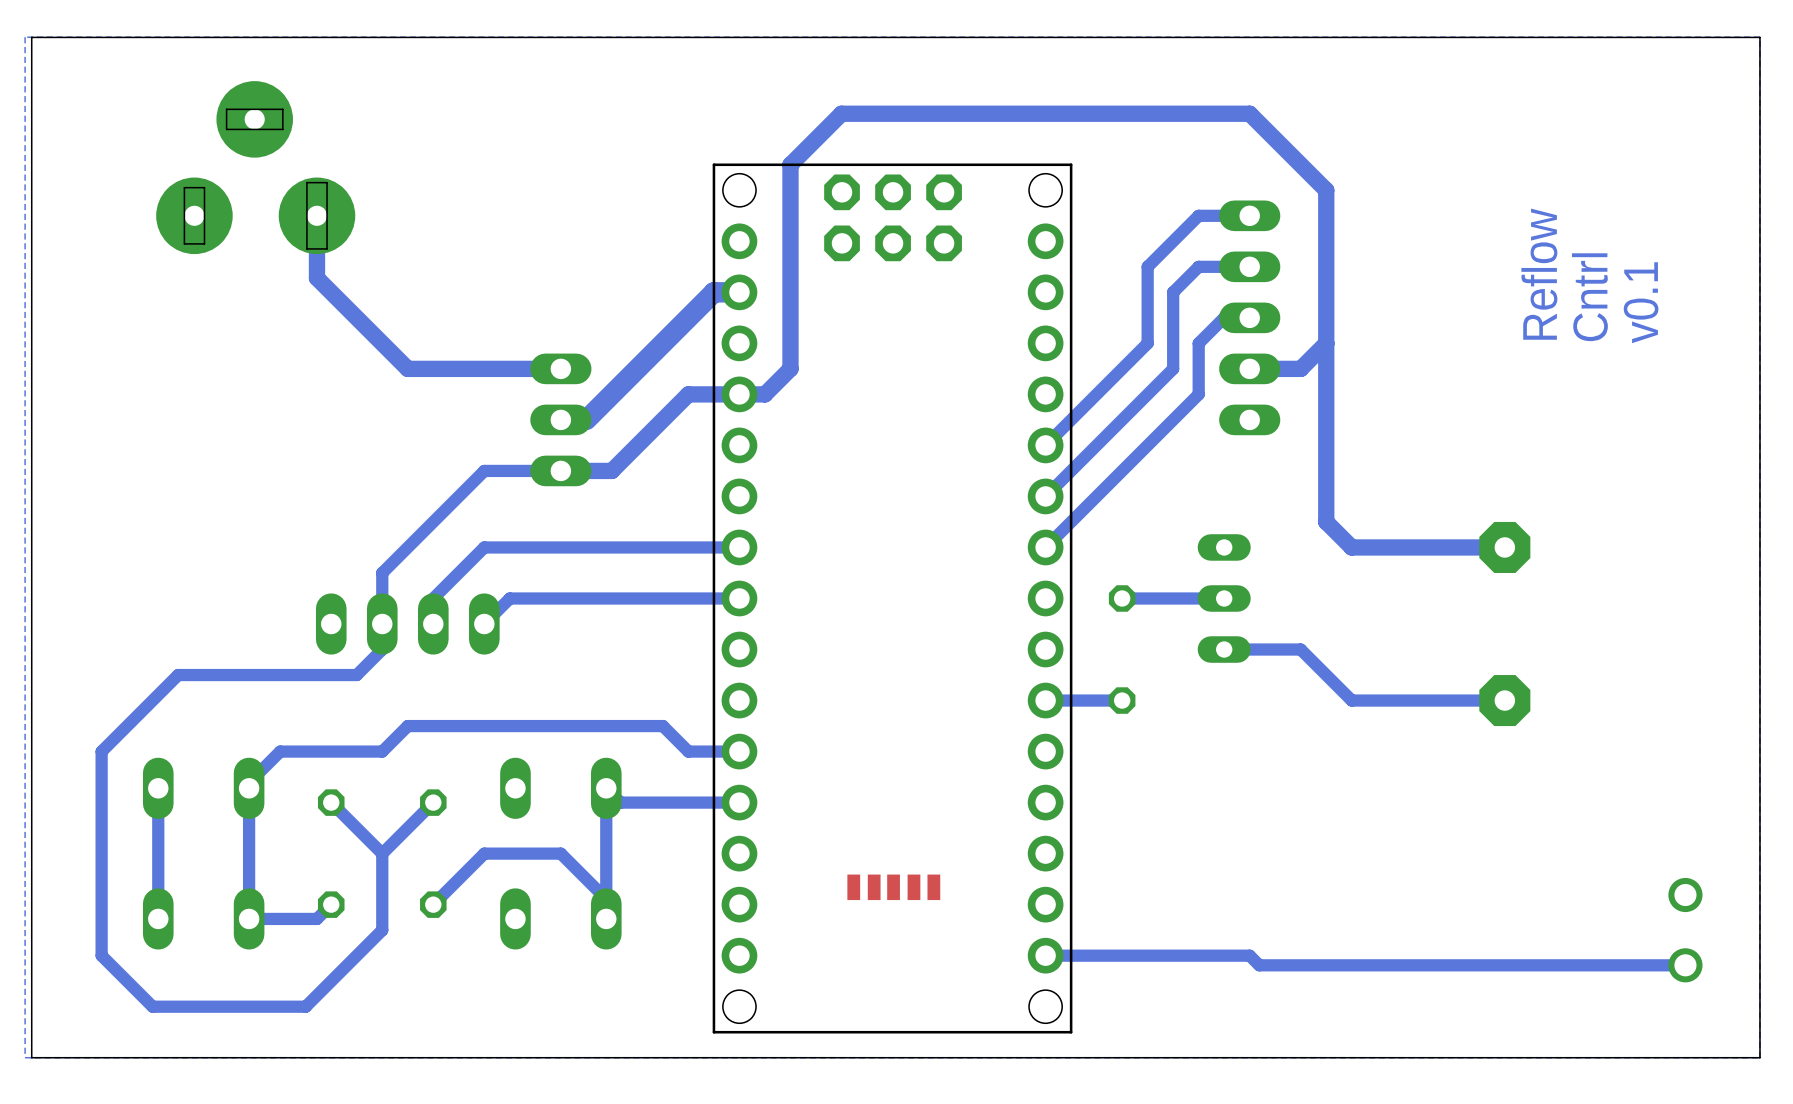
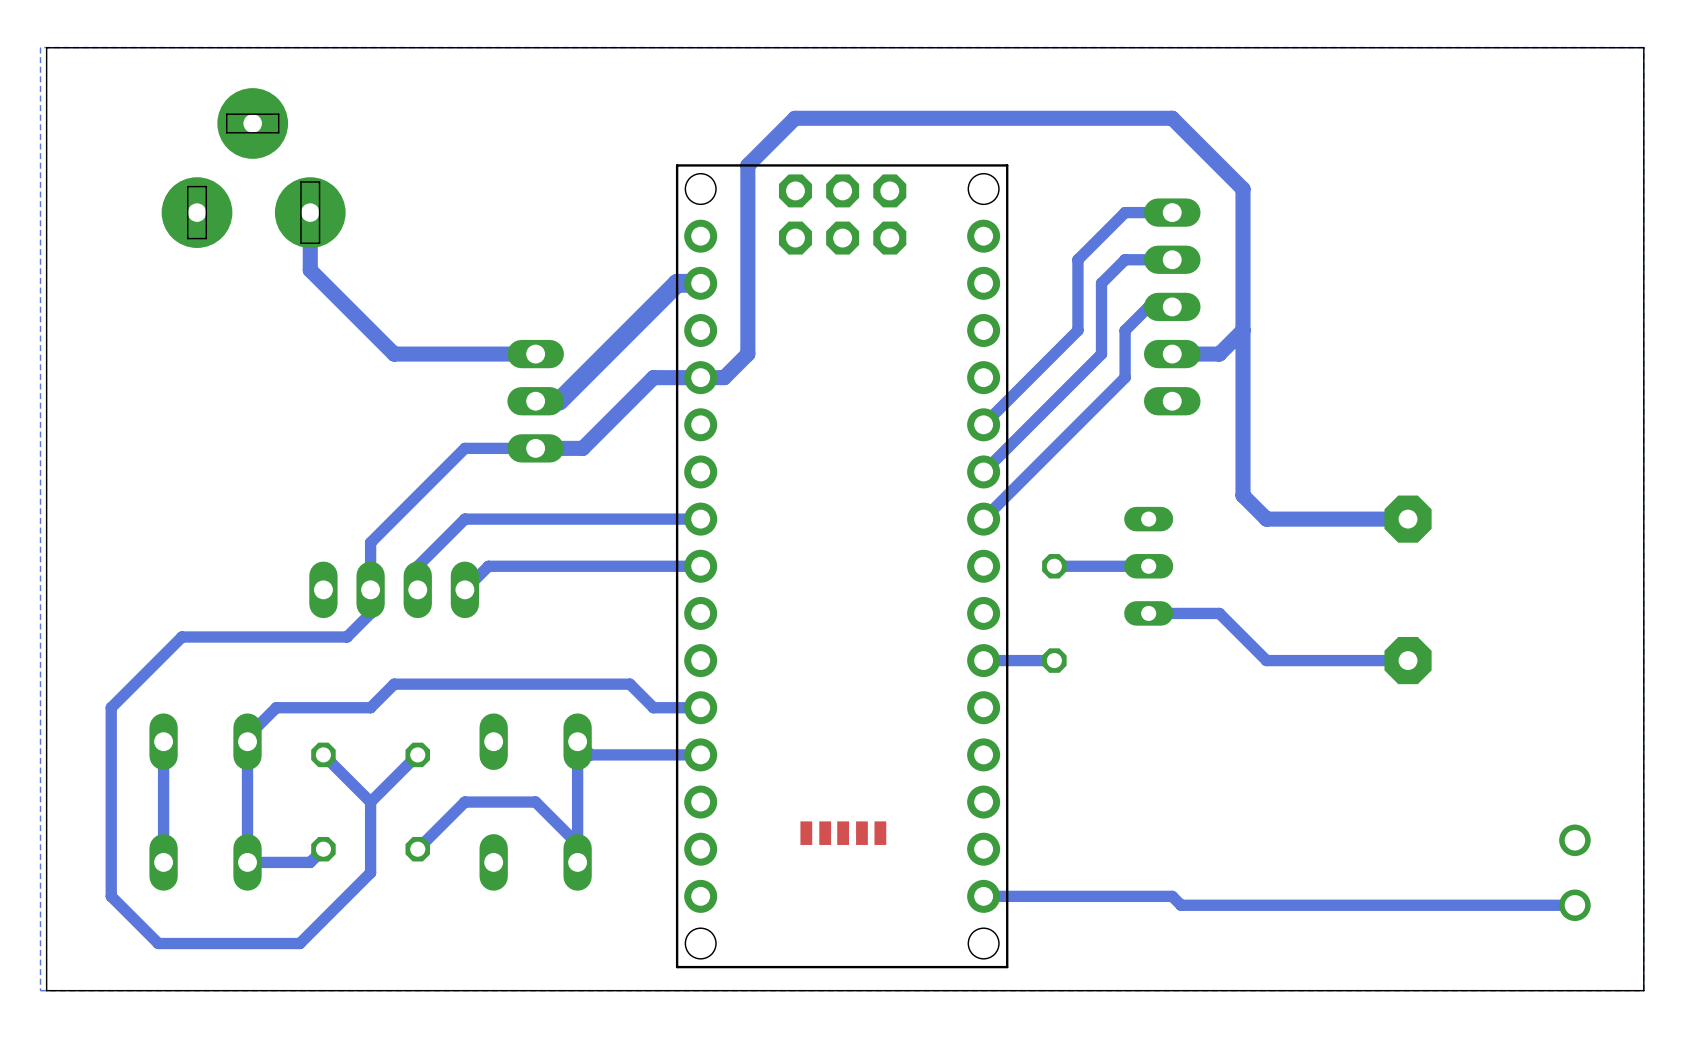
text: Reflow (1539, 274) -> none
text: Cntrl (1589, 297) -> none
text: v0.1 (1641, 302) -> none

